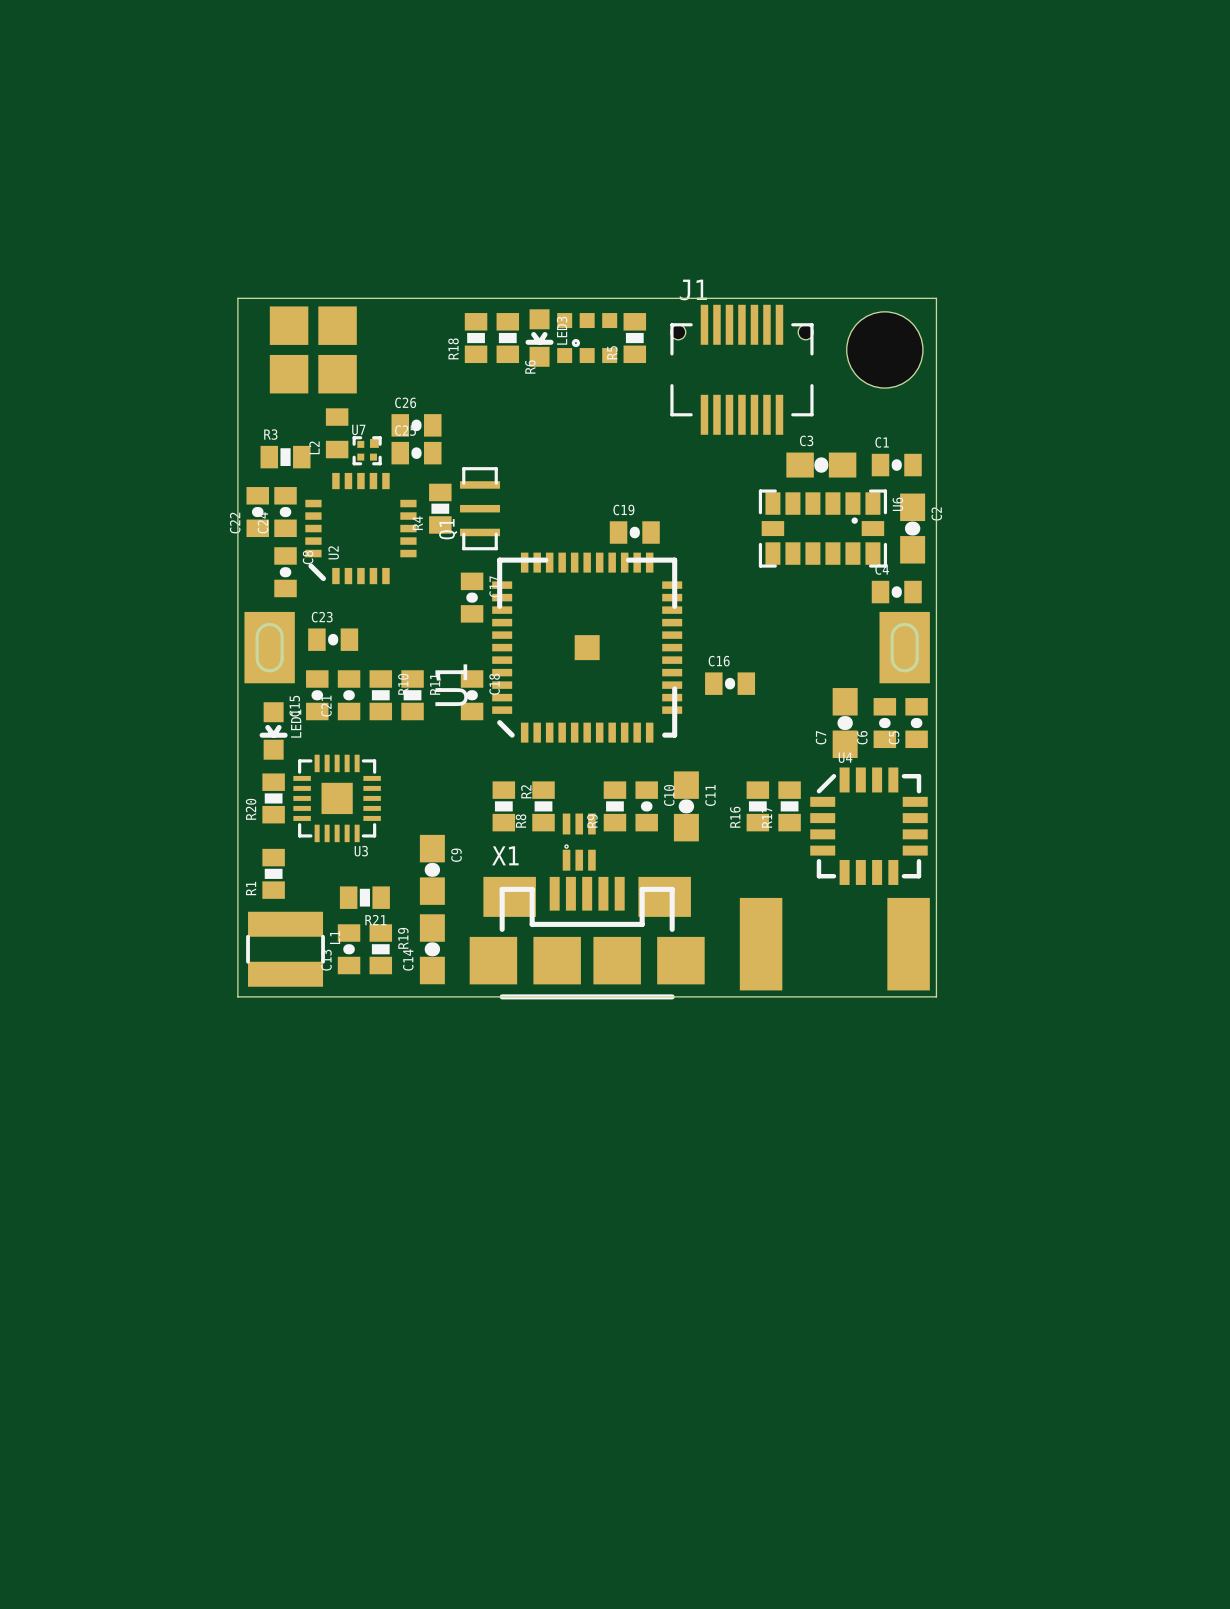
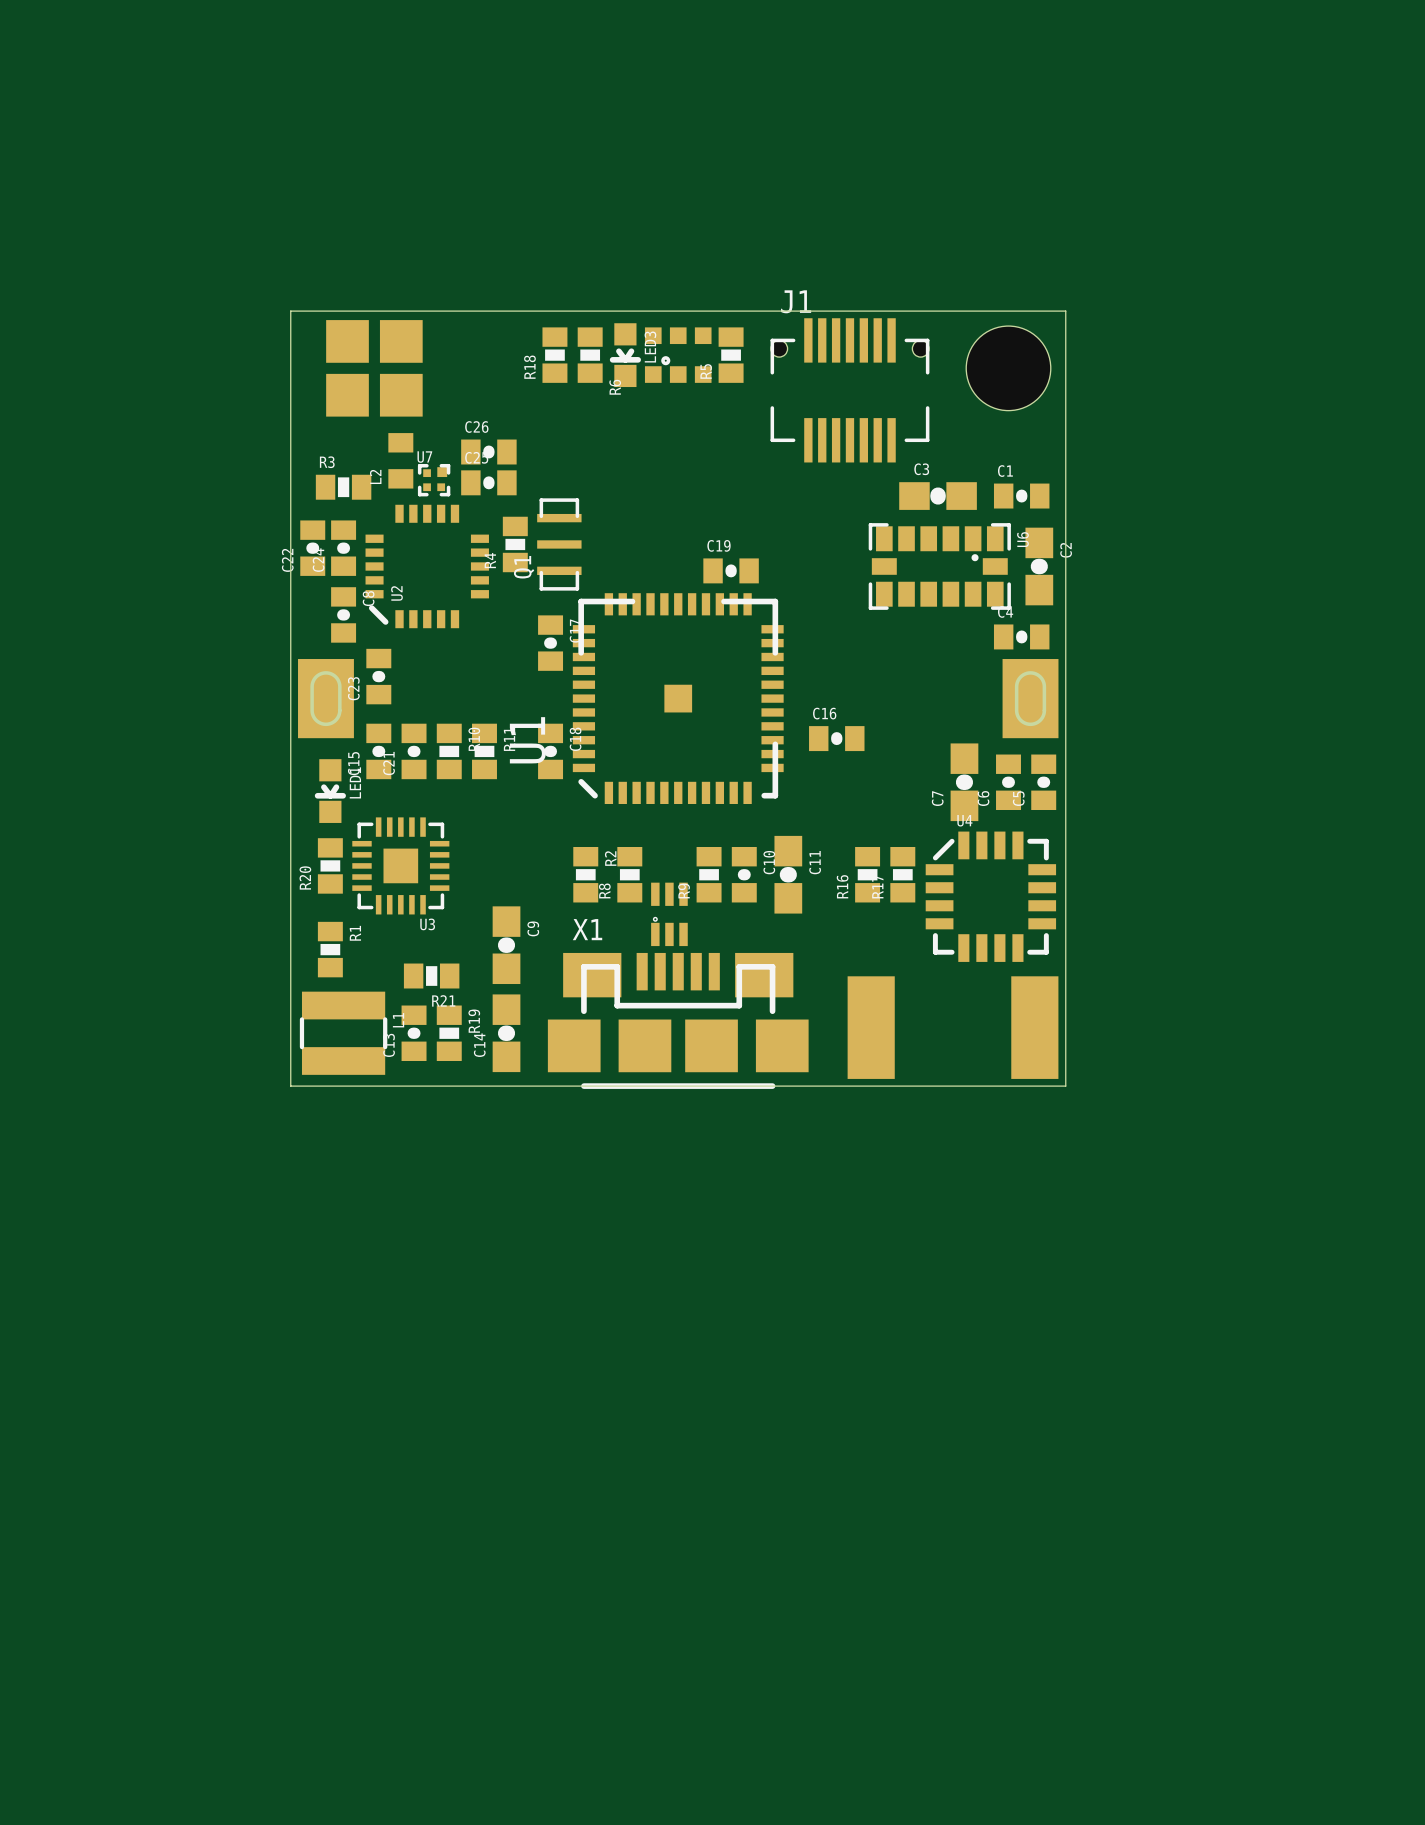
C23 rotation: 0° (333, 639) -> 90° clockwise (378, 676)
R1 name position: R1 (251, 888) -> R1 (355, 933)

